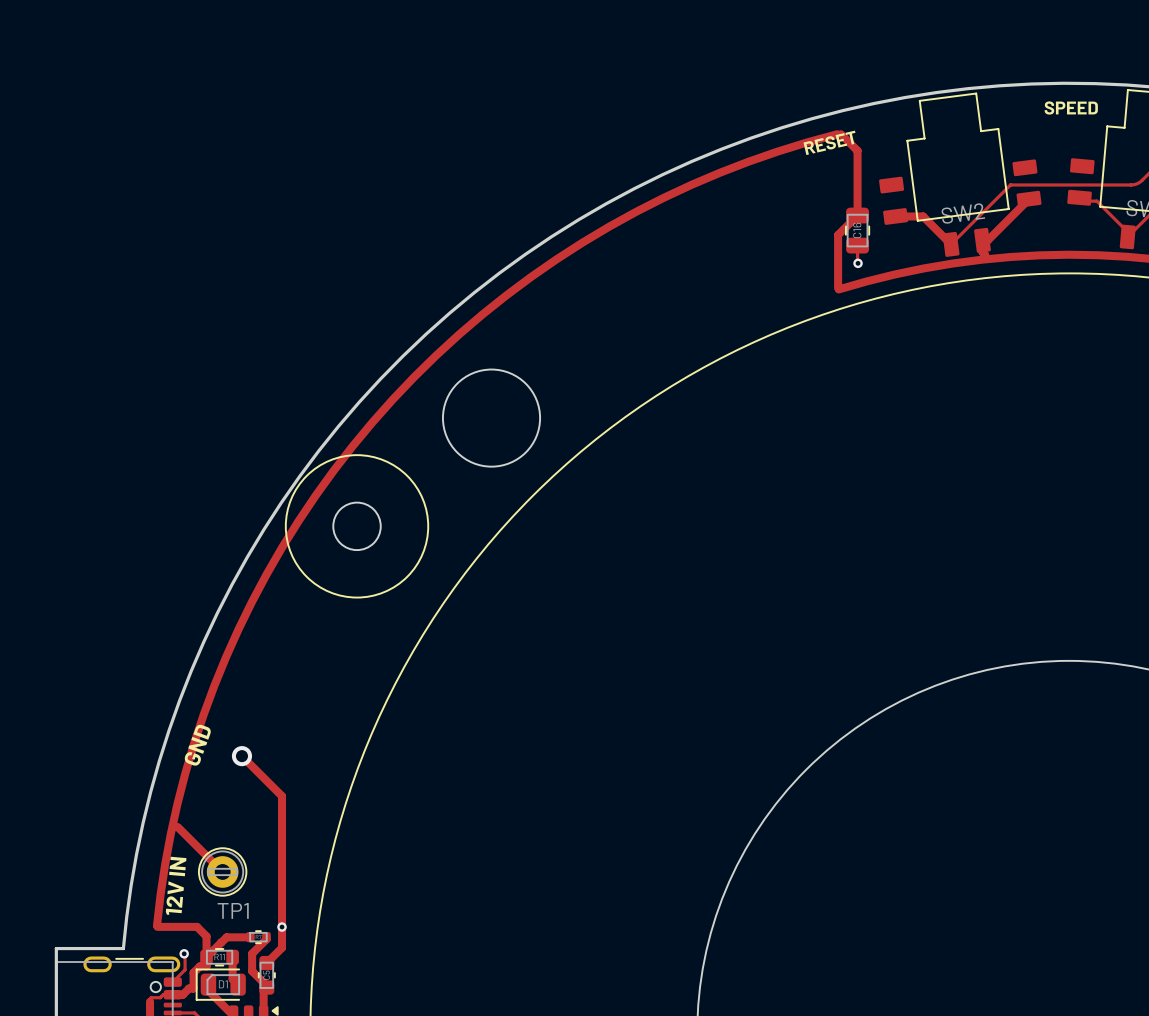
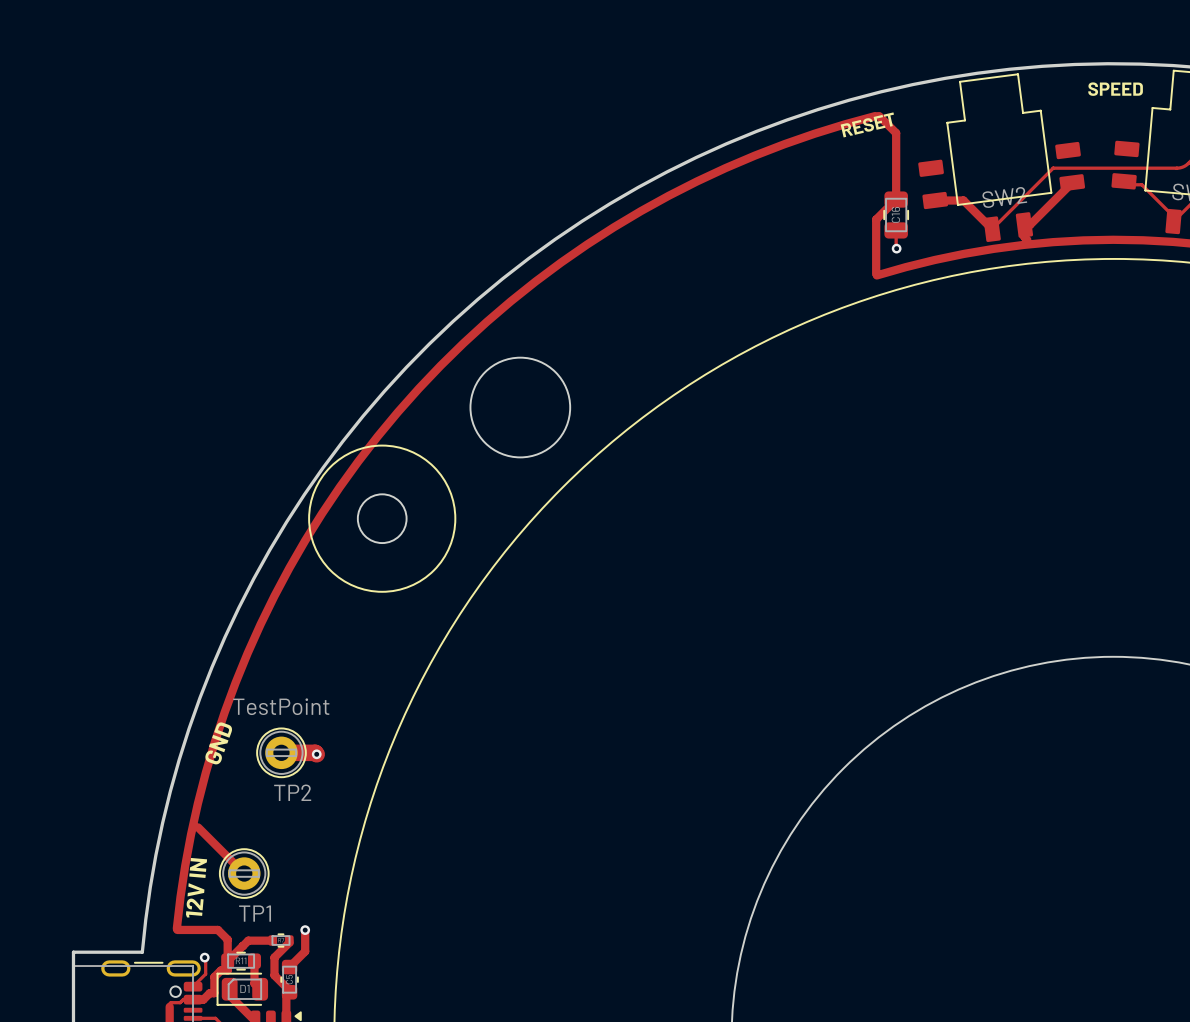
track: none -> (281, 752) (316, 754)
TP2: none -> TestPoint (281, 752)
via: none -> (316, 754)
track: (241, 756) (282, 796) (282, 927) -> none
via: (241, 756) -> none

